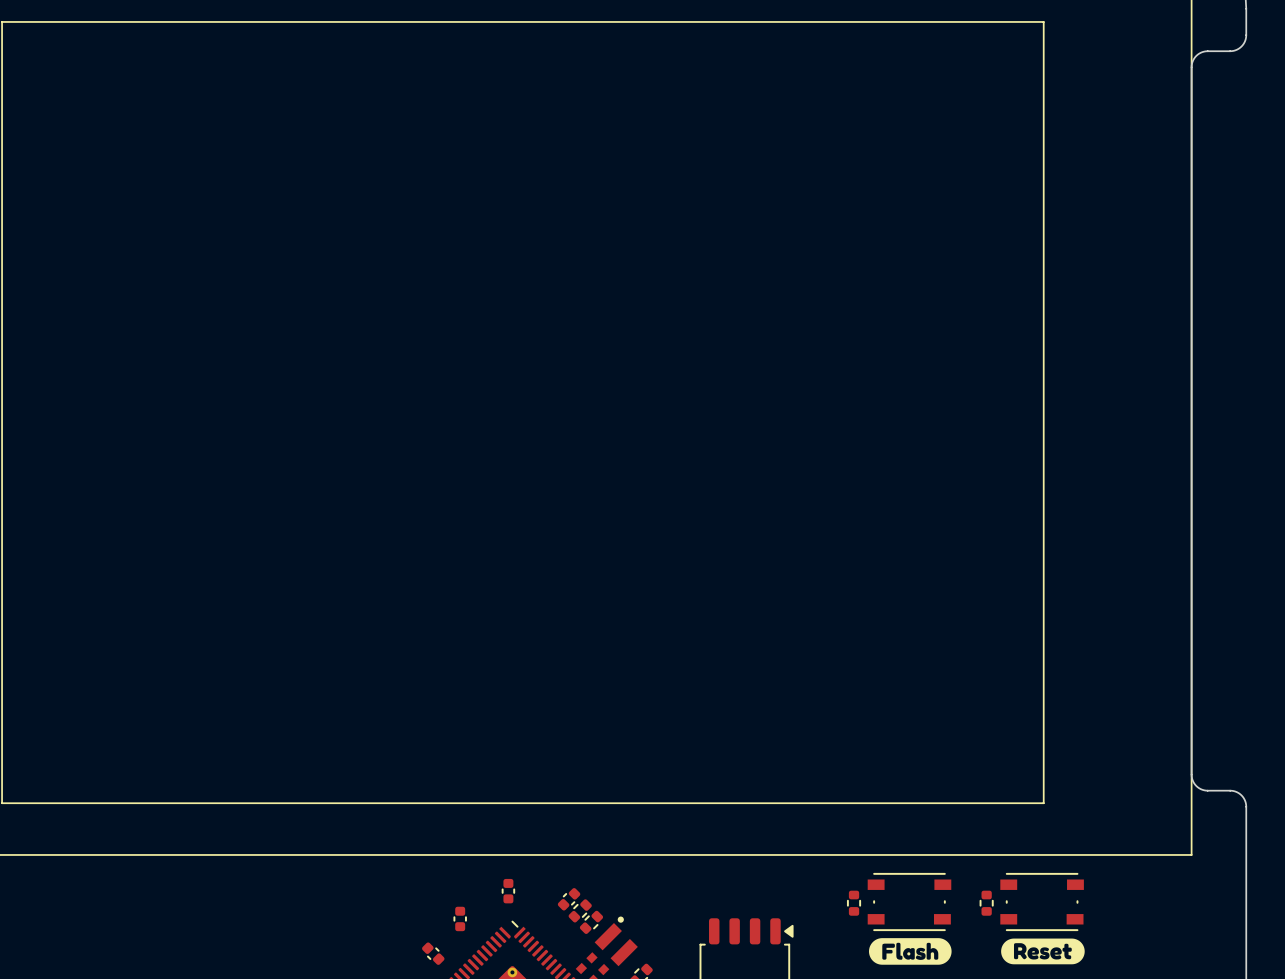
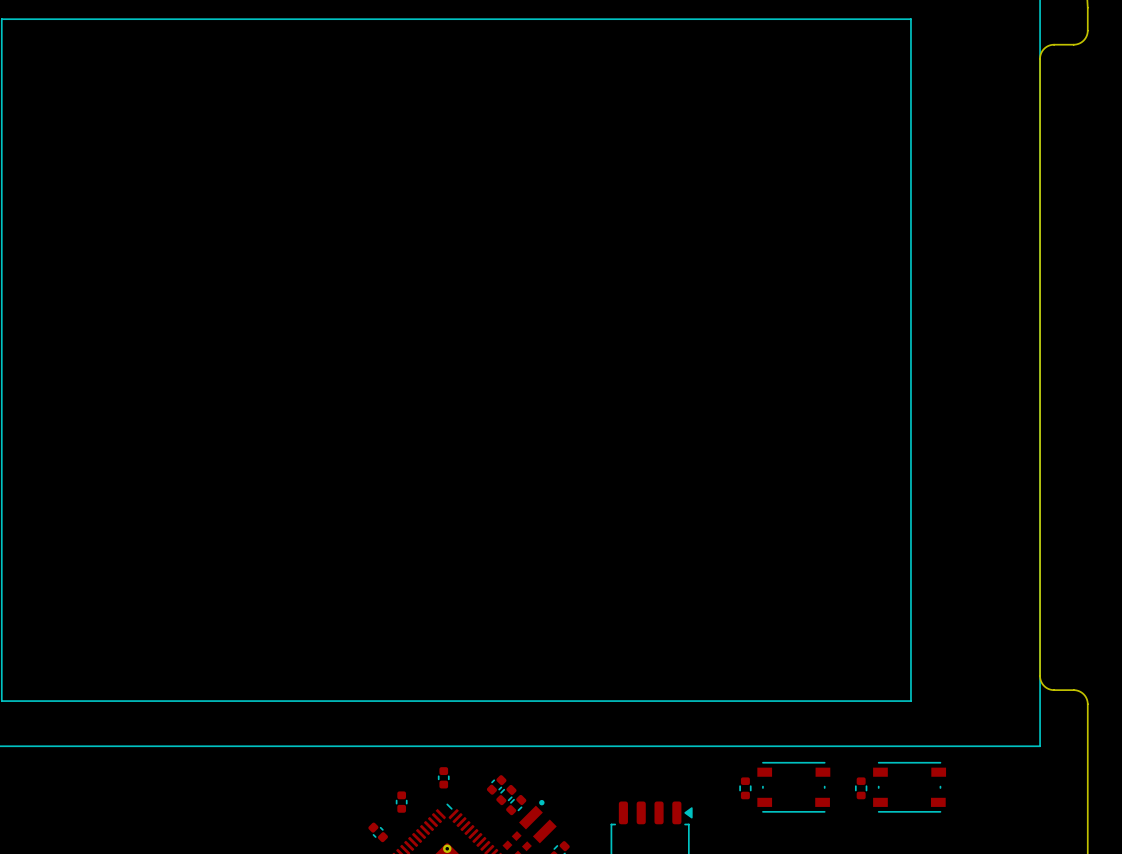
drawing: [868, 938, 952, 965] -> none
drawing: [1001, 938, 1085, 965] -> none

